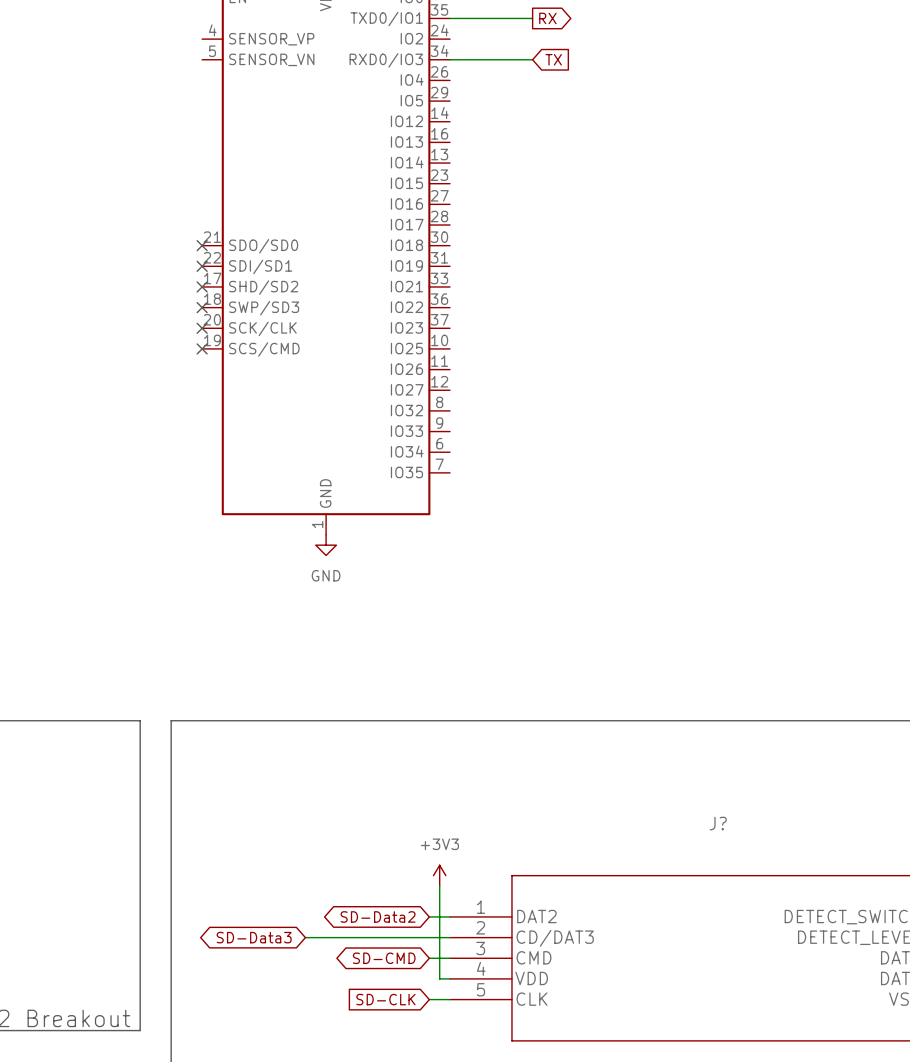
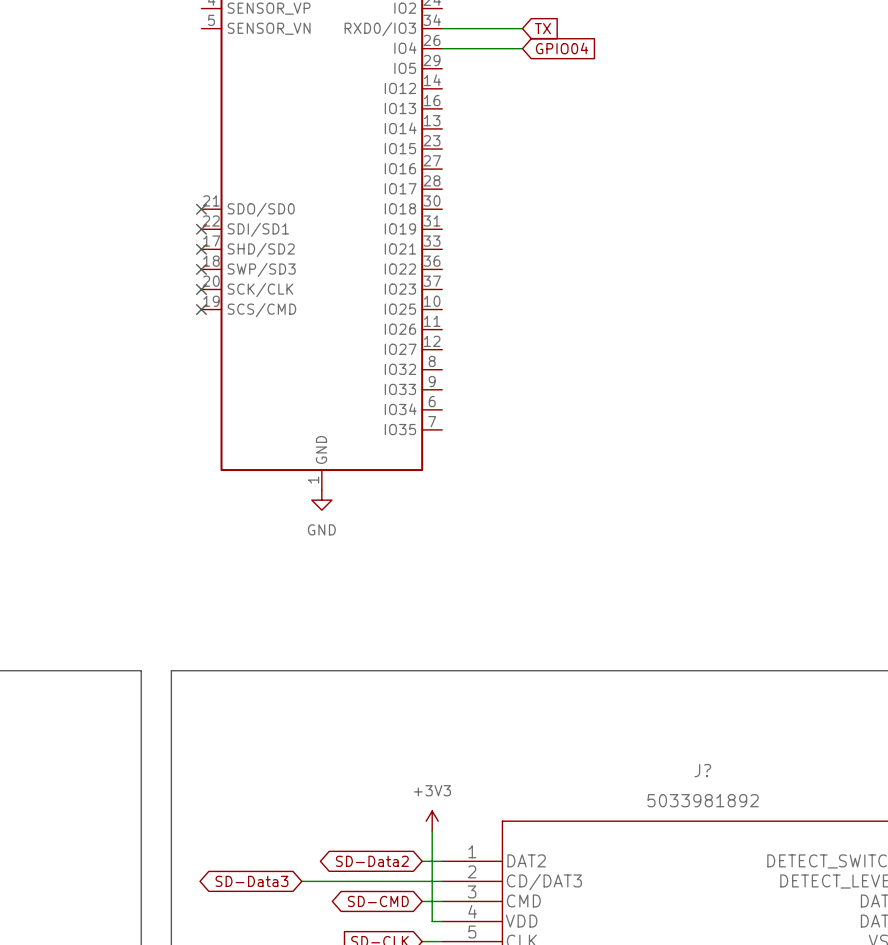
wire: none -> (442, 48) (522, 48)
global label: none -> GPIO04 (562, 48)
J? value: none -> 5033981892 (703, 800)

